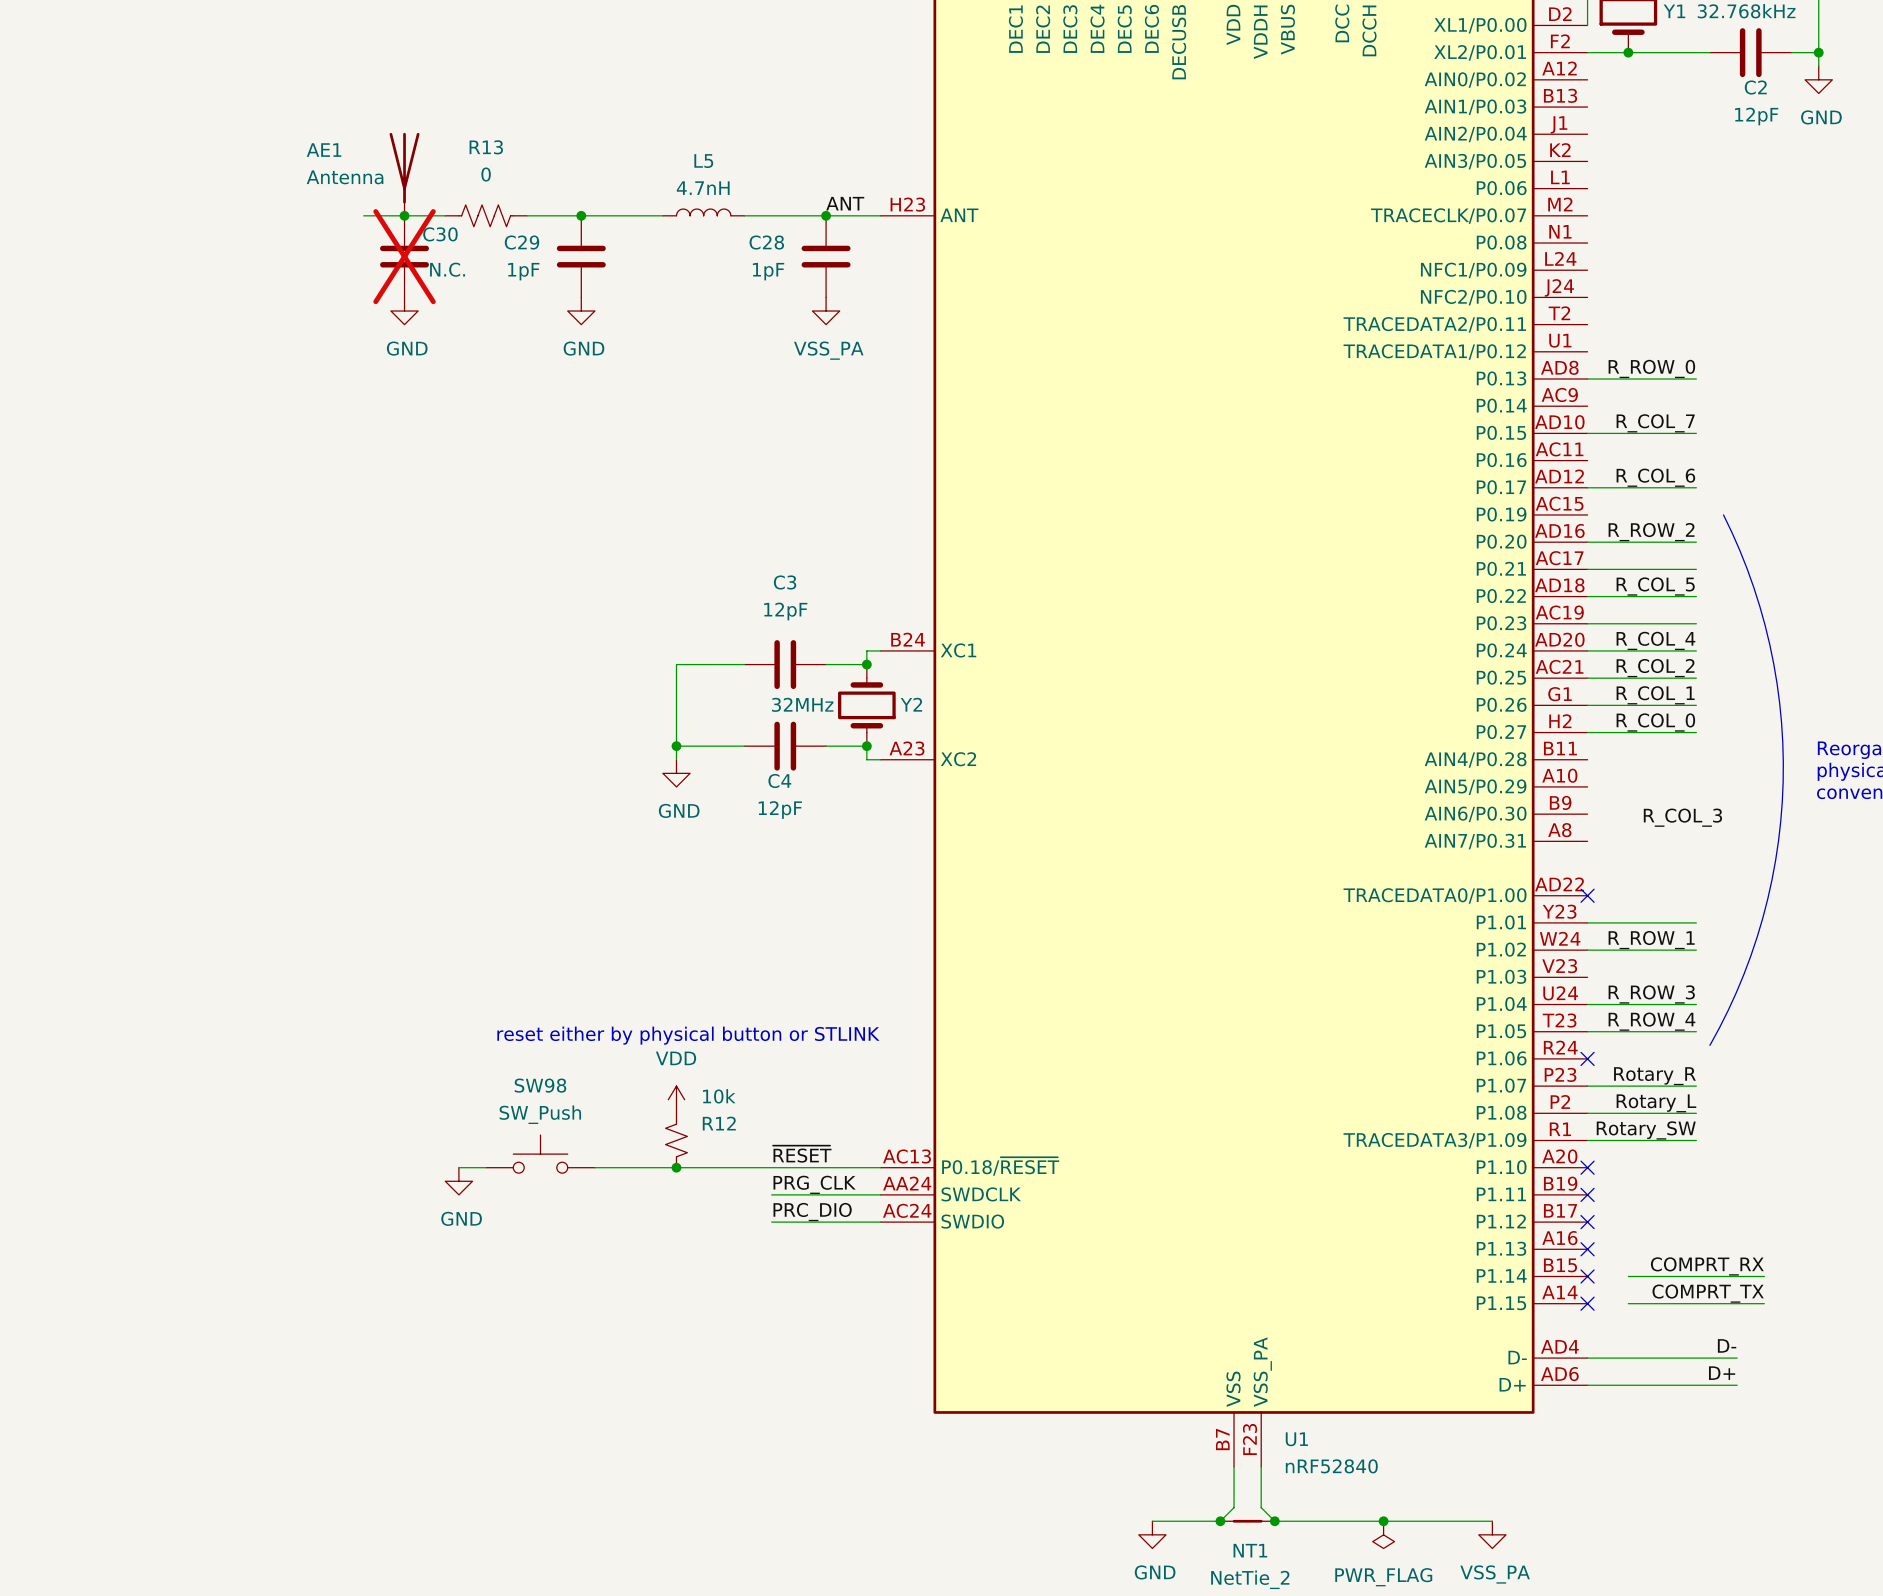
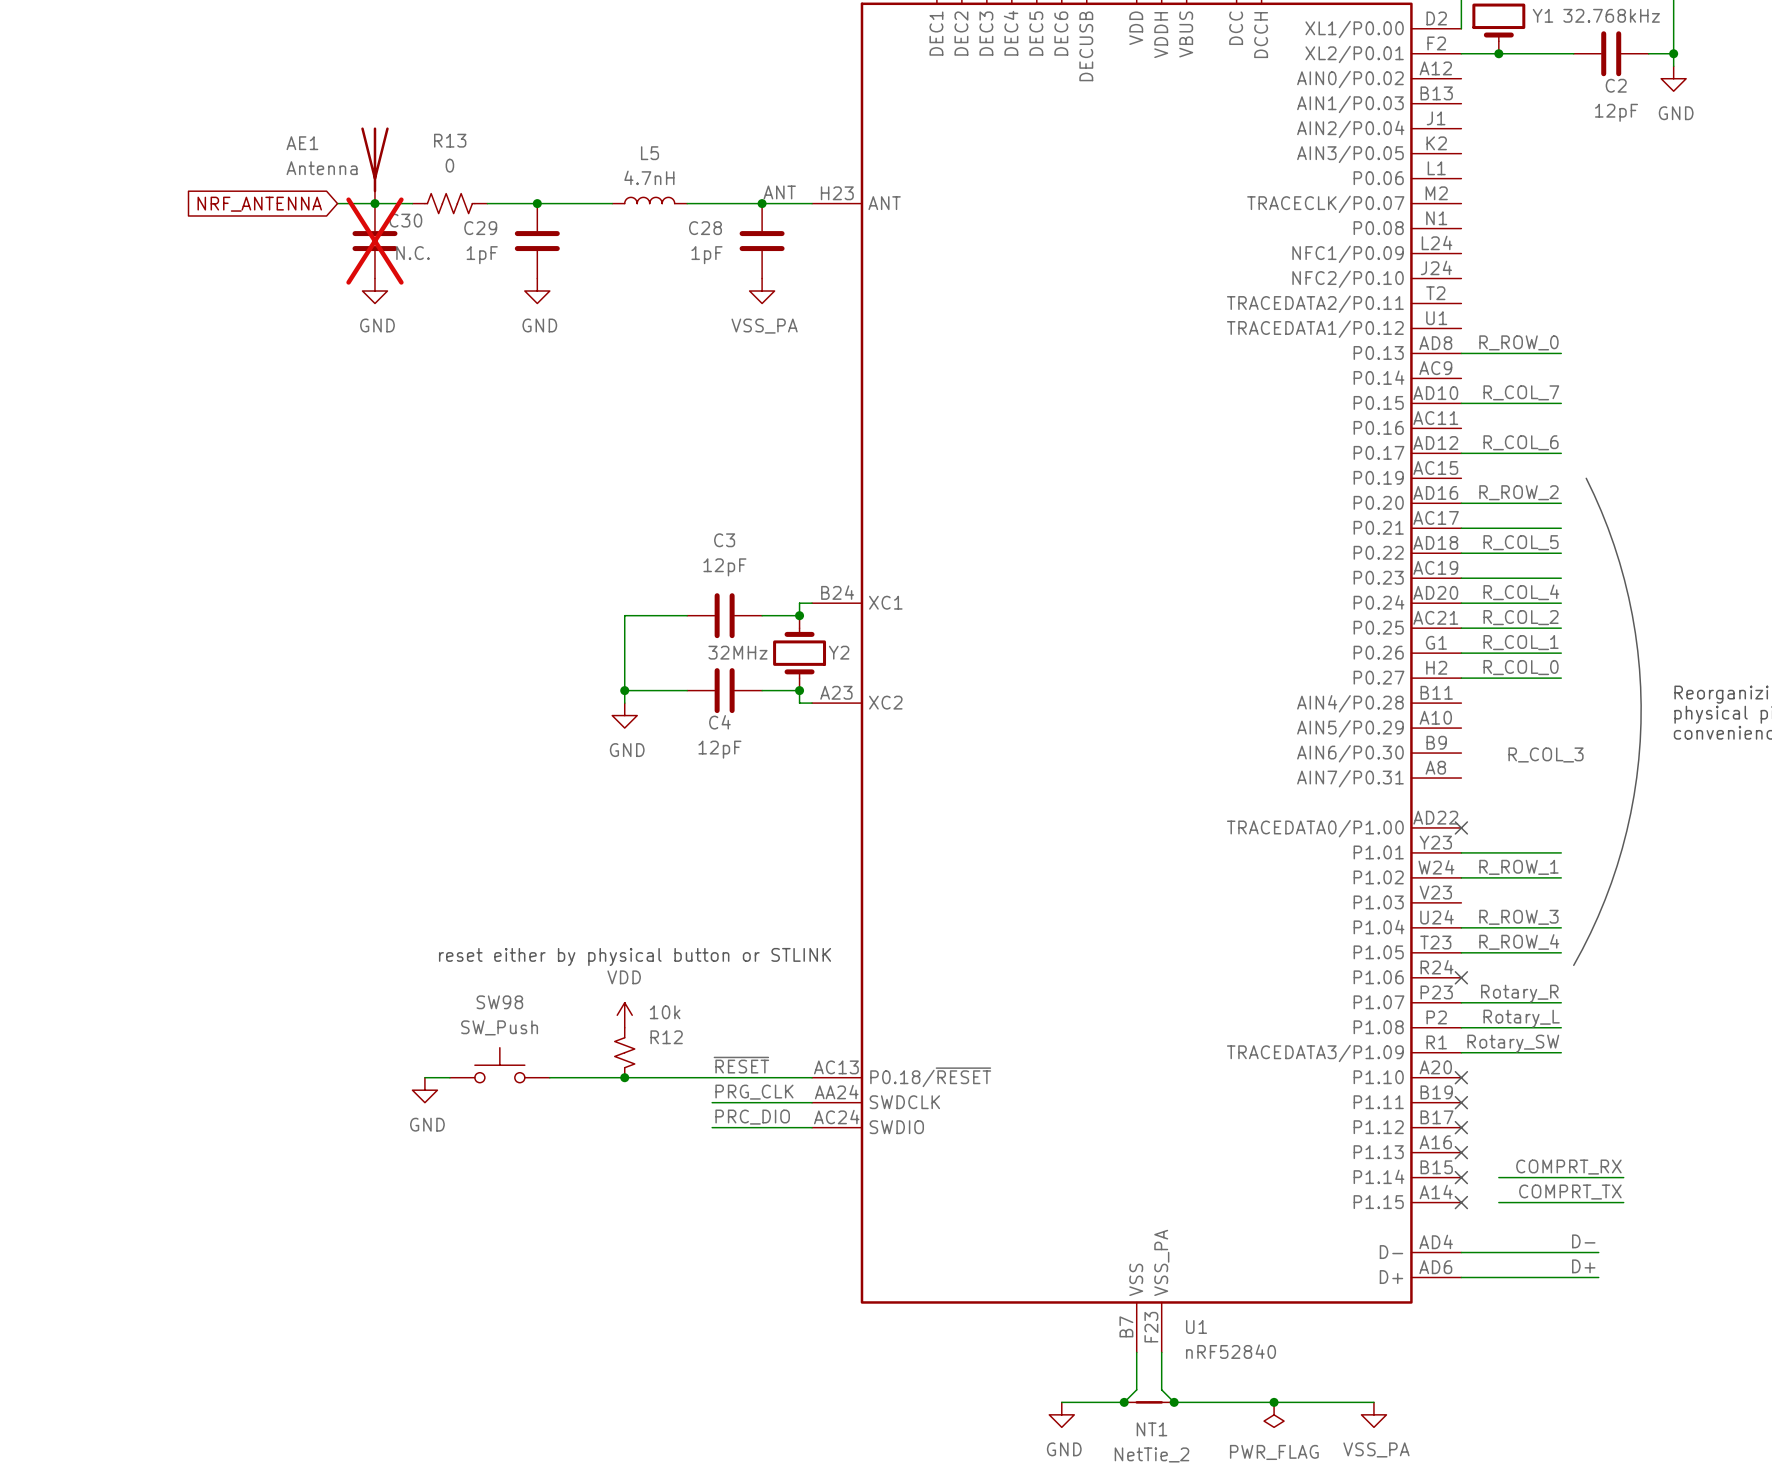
global label: none -> NRF_ANTENNA (259, 204)

